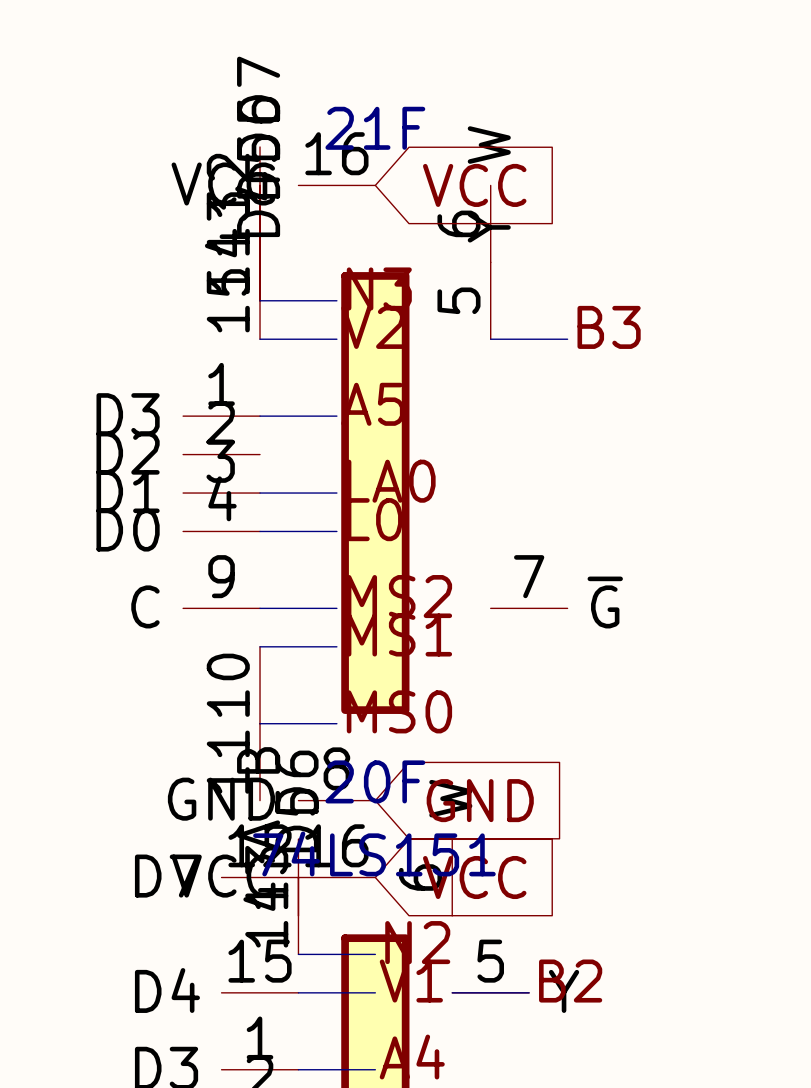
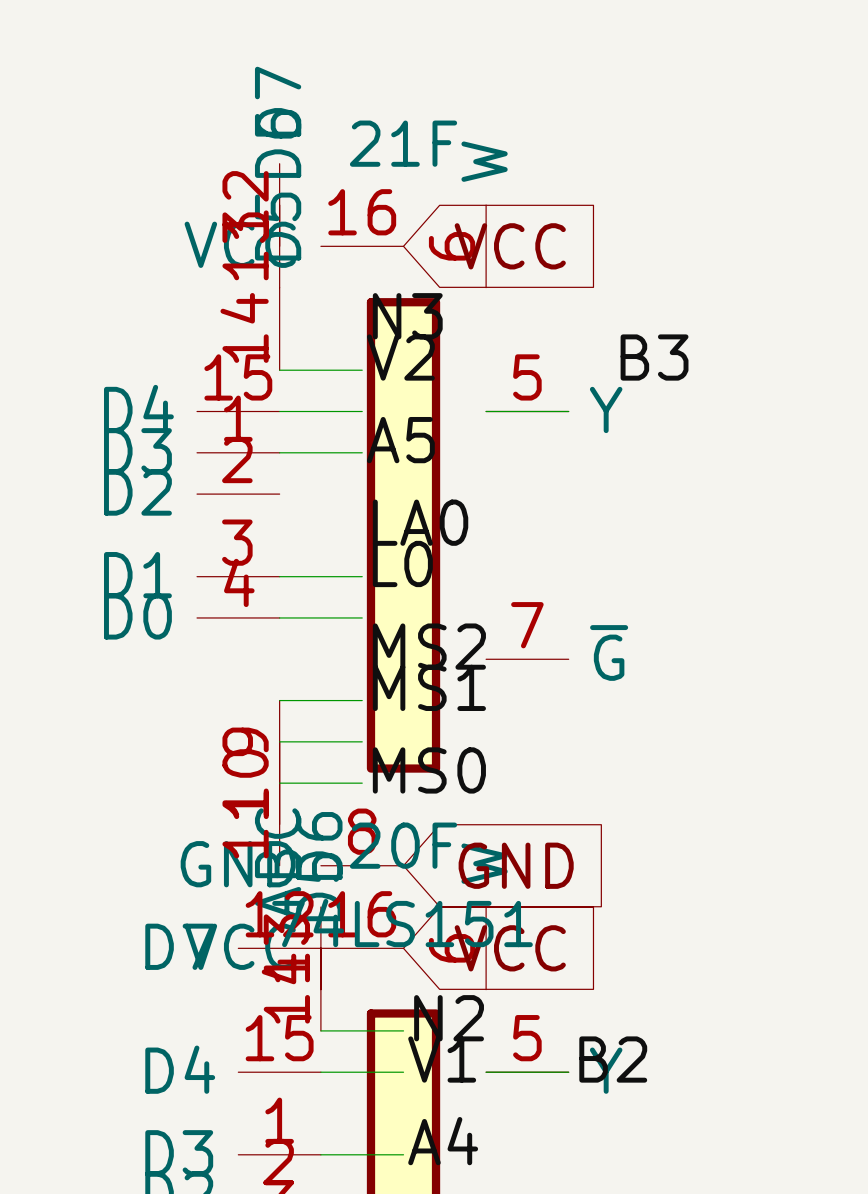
21F symbol: [183, 146, 568, 801] -> [197, 163, 569, 866]
global label position: VCC (474, 185) -> VCC (510, 246)
wire: (260, 300) (336, 300) -> (279, 411) (362, 411)
wire: (490, 339) (567, 339) -> (486, 411) (568, 411)
wire: (260, 493) (336, 493) -> (279, 617) (362, 617)
wire: (260, 608) (336, 608) -> (279, 741) (362, 741)

